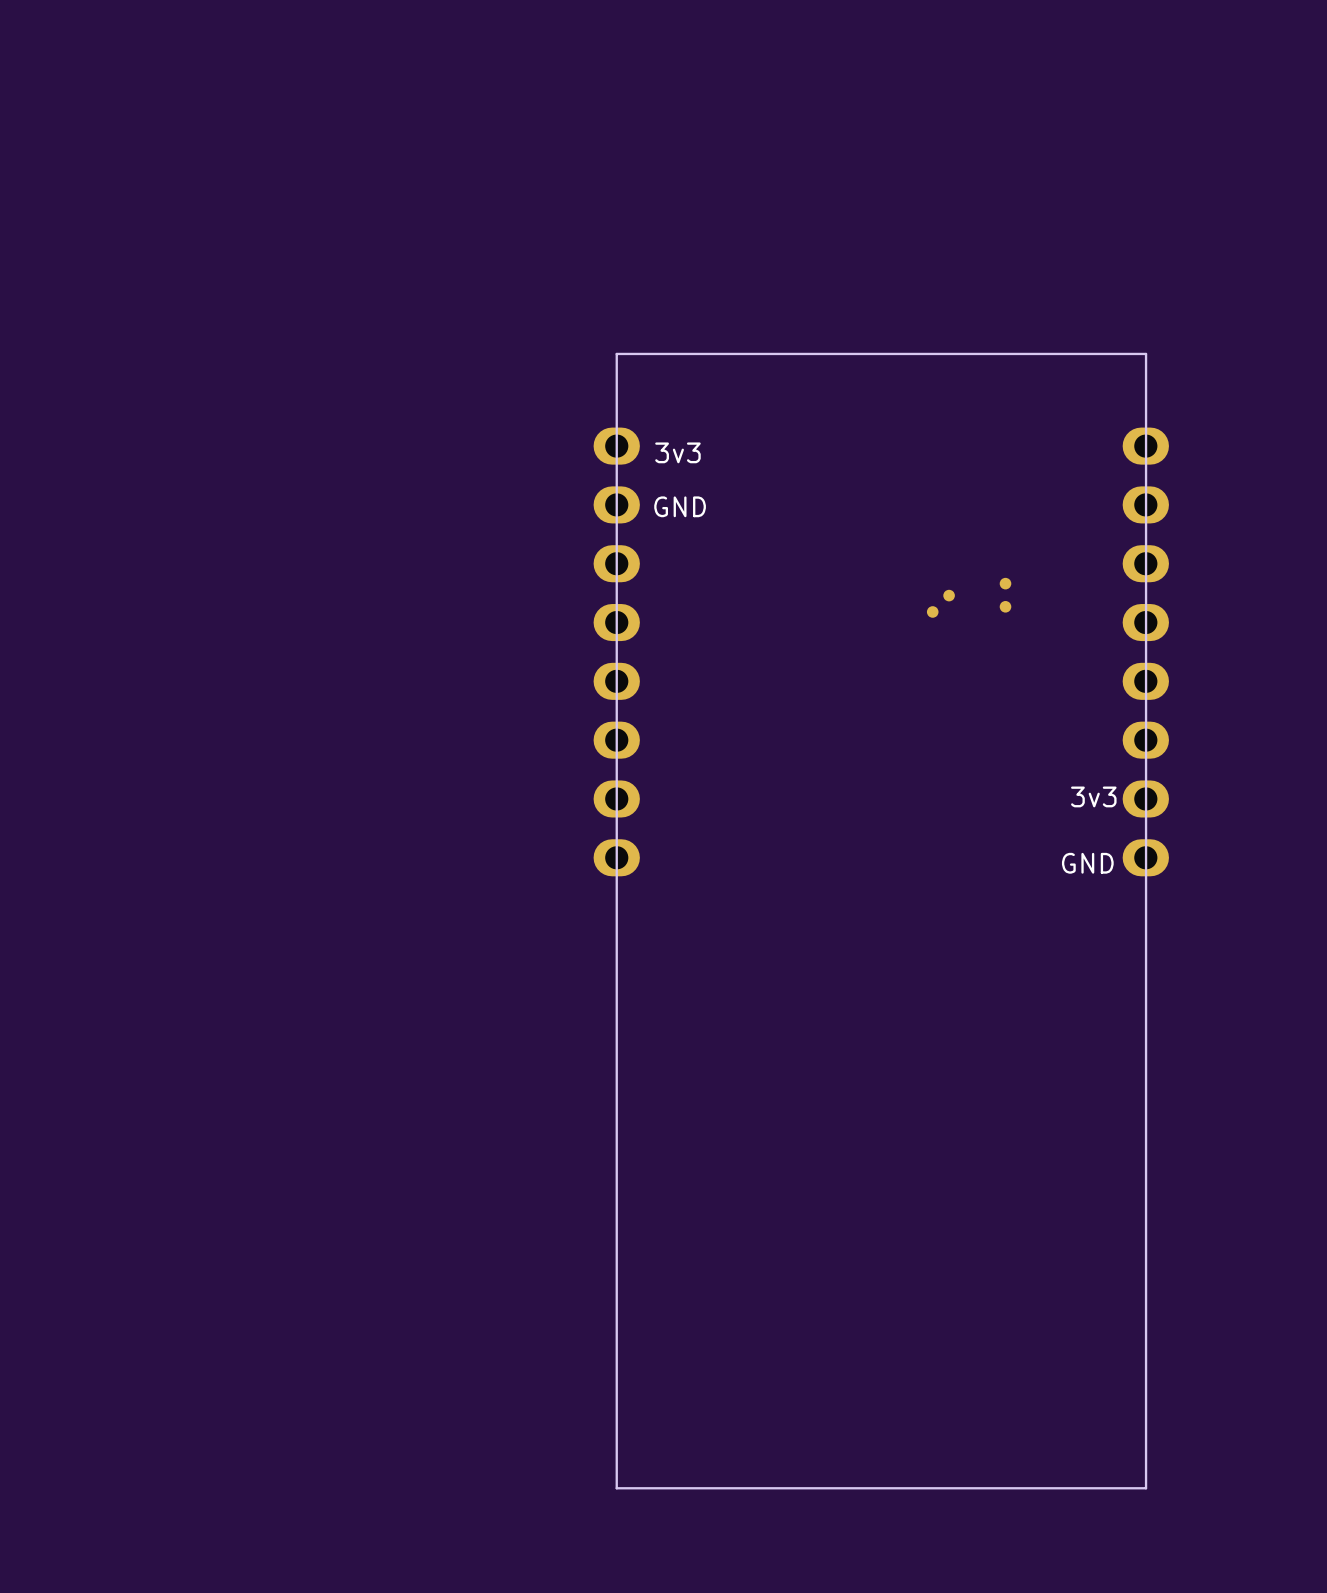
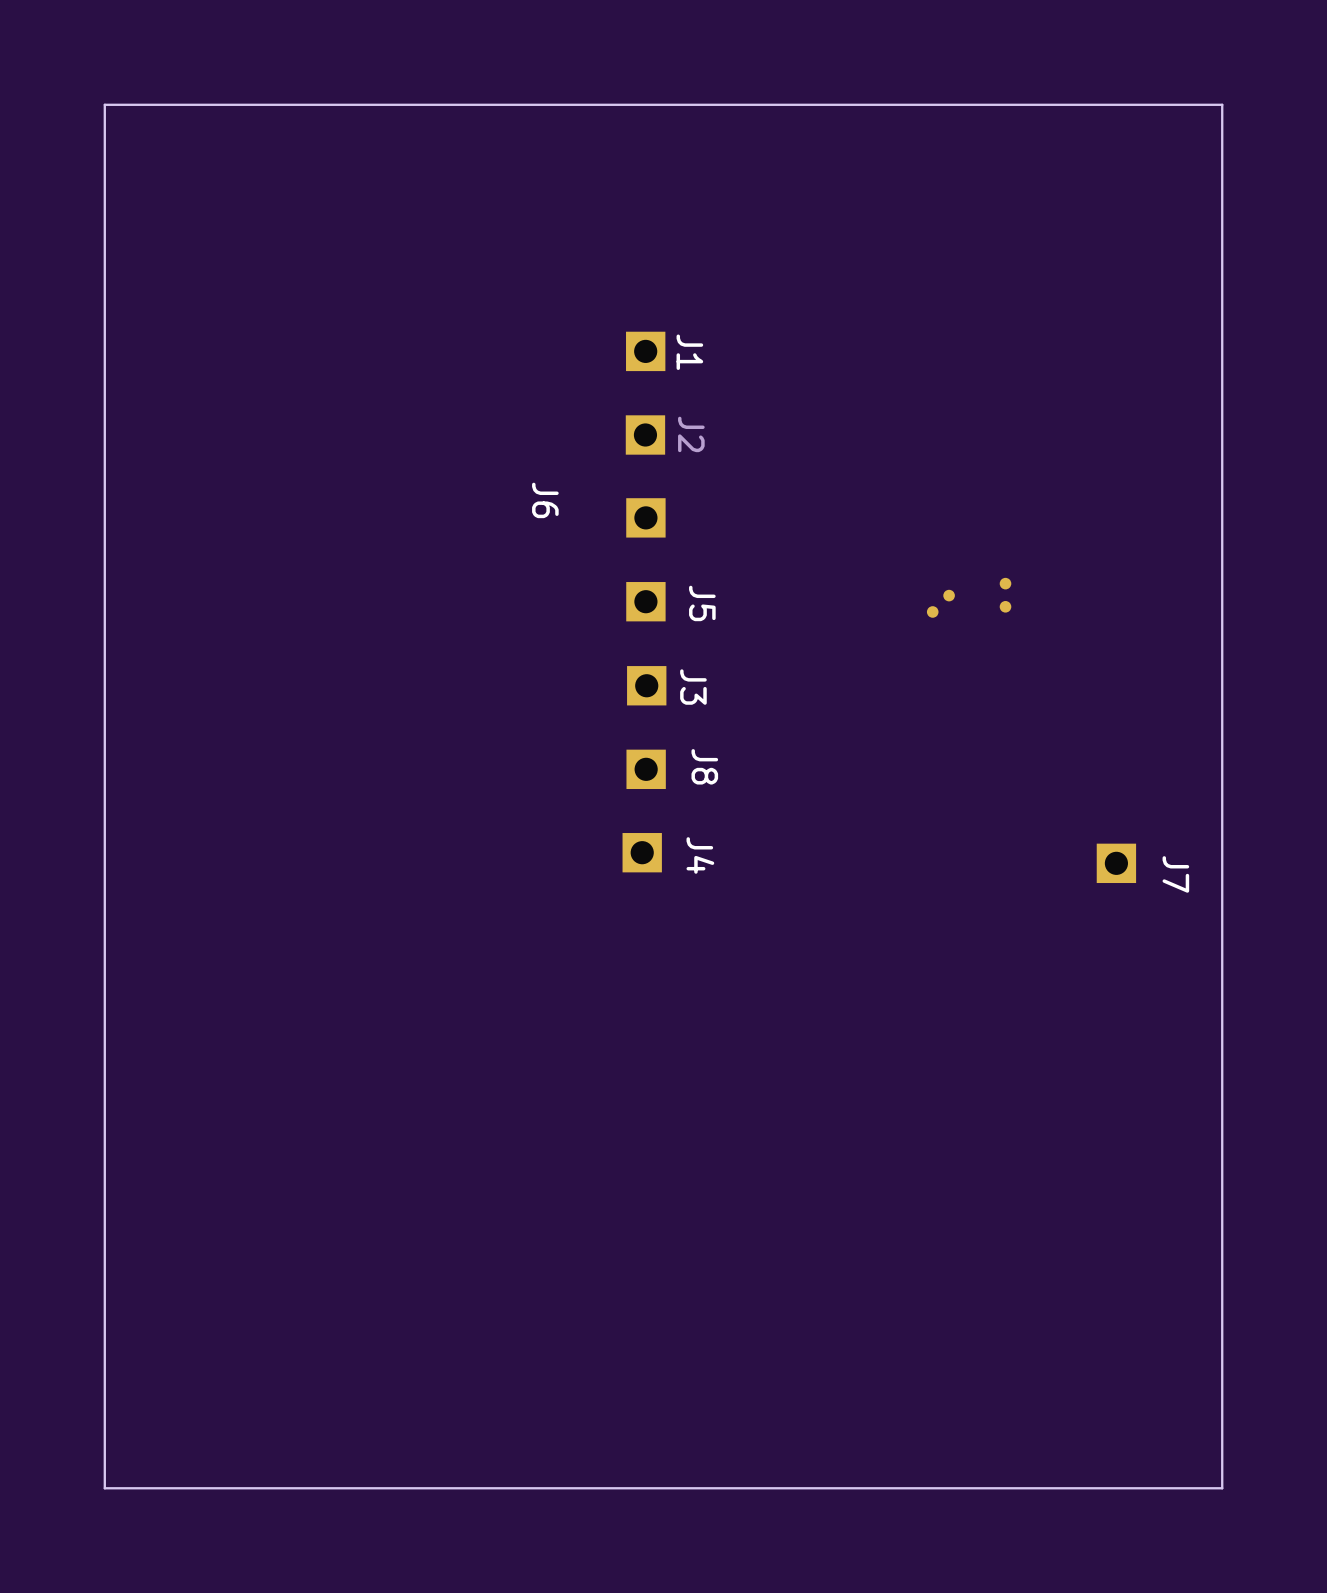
J1: none -> (645, 351)
J2: none -> (645, 434)
text: 3v3 (677, 452) -> none
text: GND (680, 506) -> none
J6: none -> (645, 517)
J5: none -> (645, 601)
part: (616, 651) -> none
part: (1145, 651) -> none
J3: none -> (646, 685)
J8: none -> (646, 769)
text: 3v3 (1093, 796) -> none
J4: none -> (642, 852)
text: GND (1087, 863) -> none
J7: none -> (1116, 863)
board edge: (1146, 1488) (1146, 353) (616, 353) (616, 1488) -> (1146, 1488) (1222, 1488) (1222, 104) (104, 104) (104, 1488) (616, 1488)

